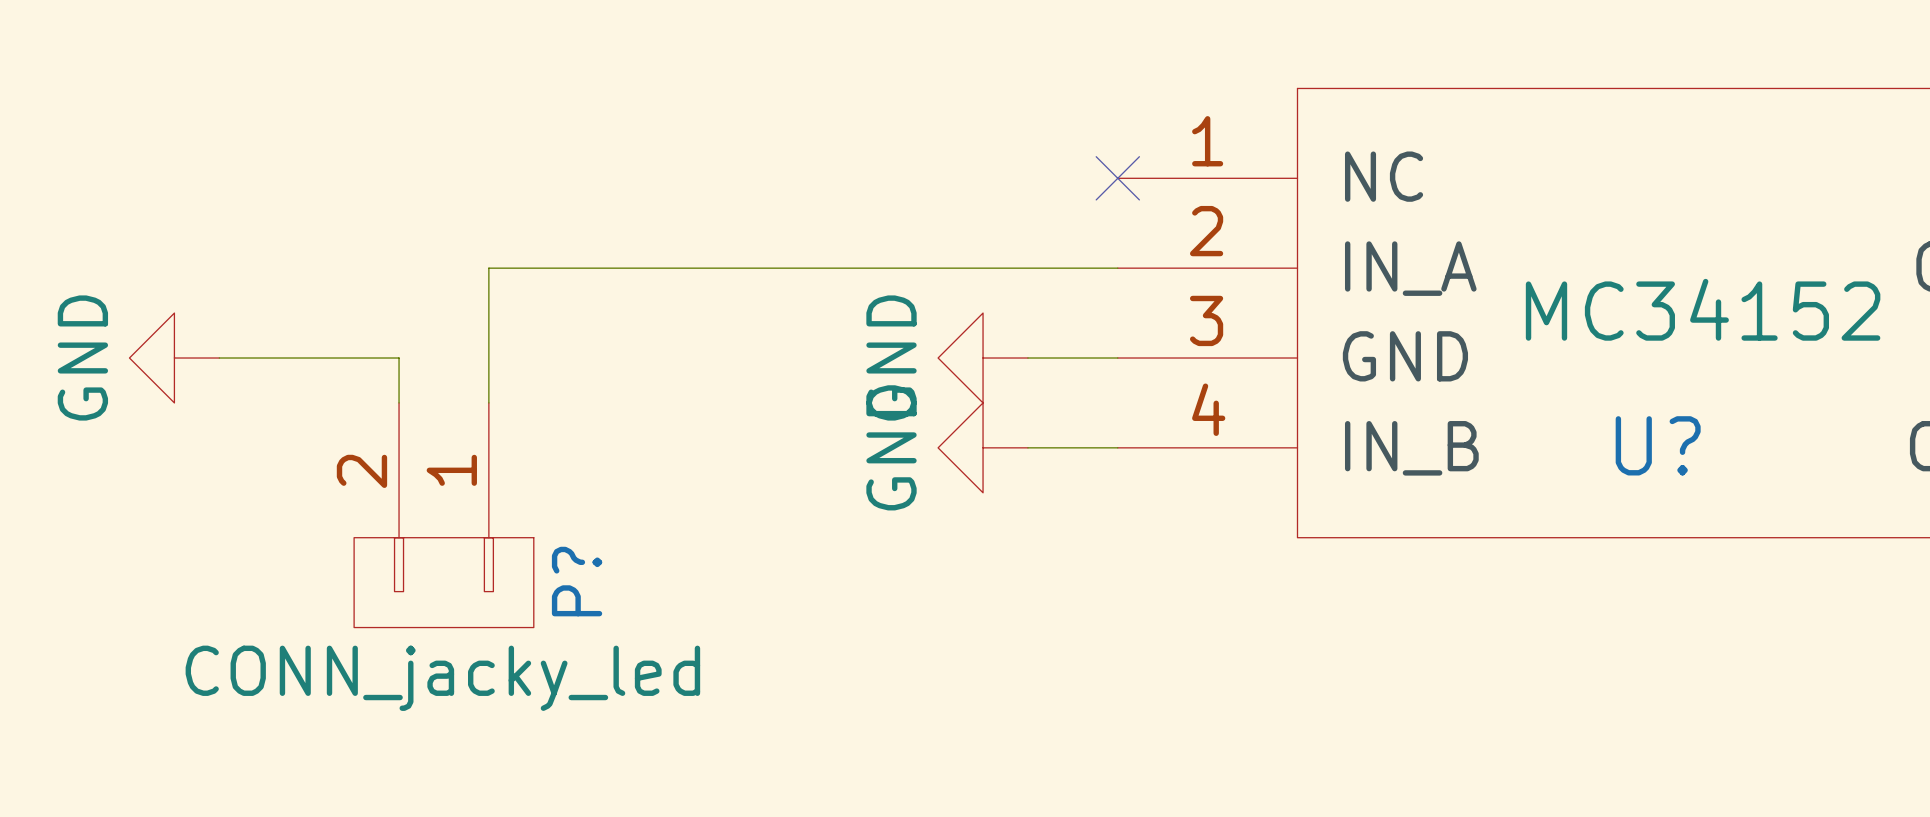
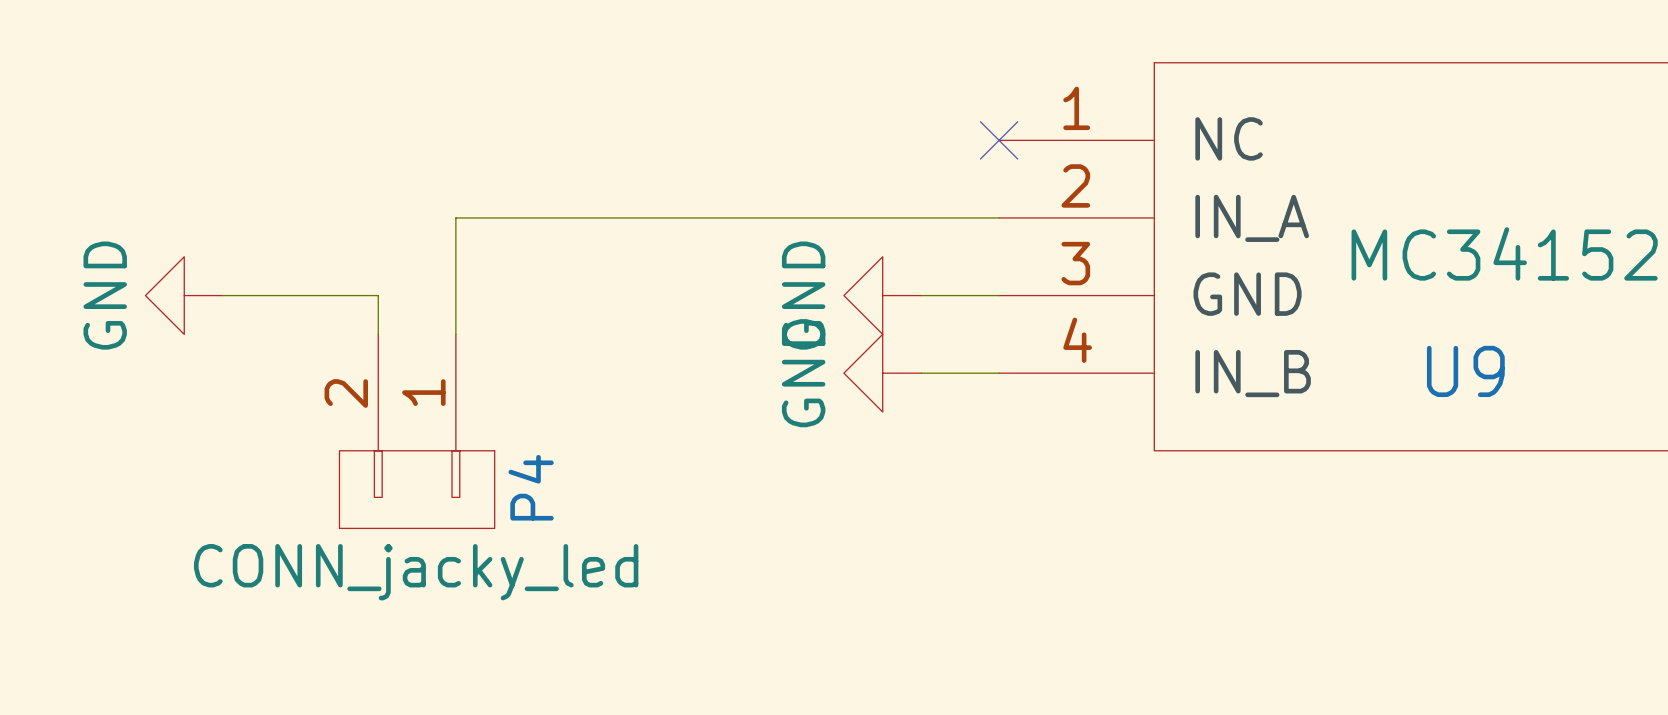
U? name: U? (1658, 445) -> U9 (1465, 371)
P? name: P? (577, 581) -> P4 (531, 487)

